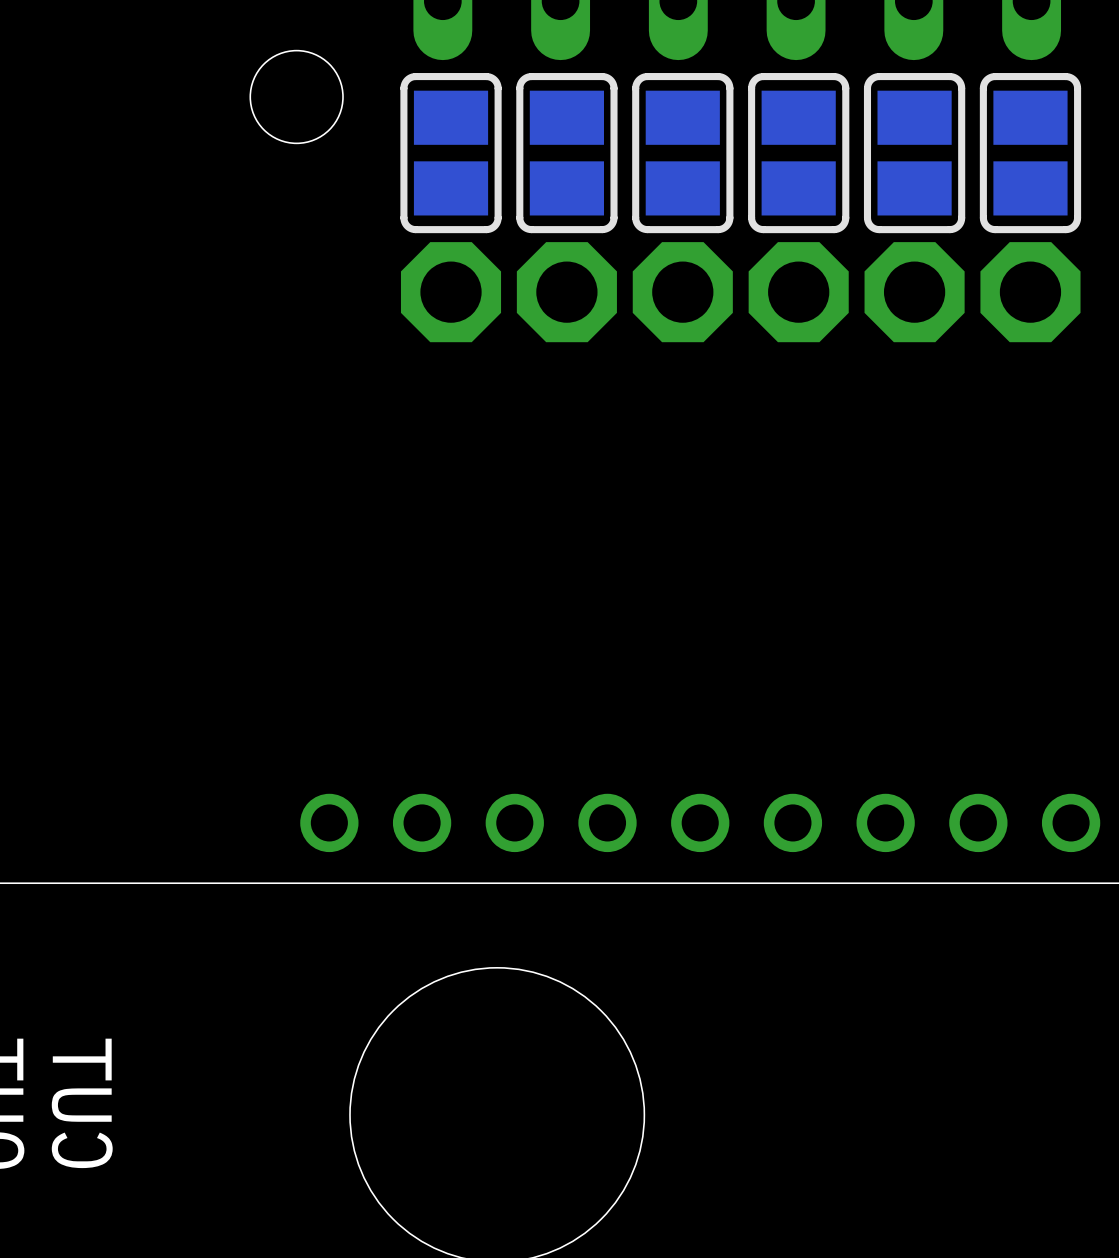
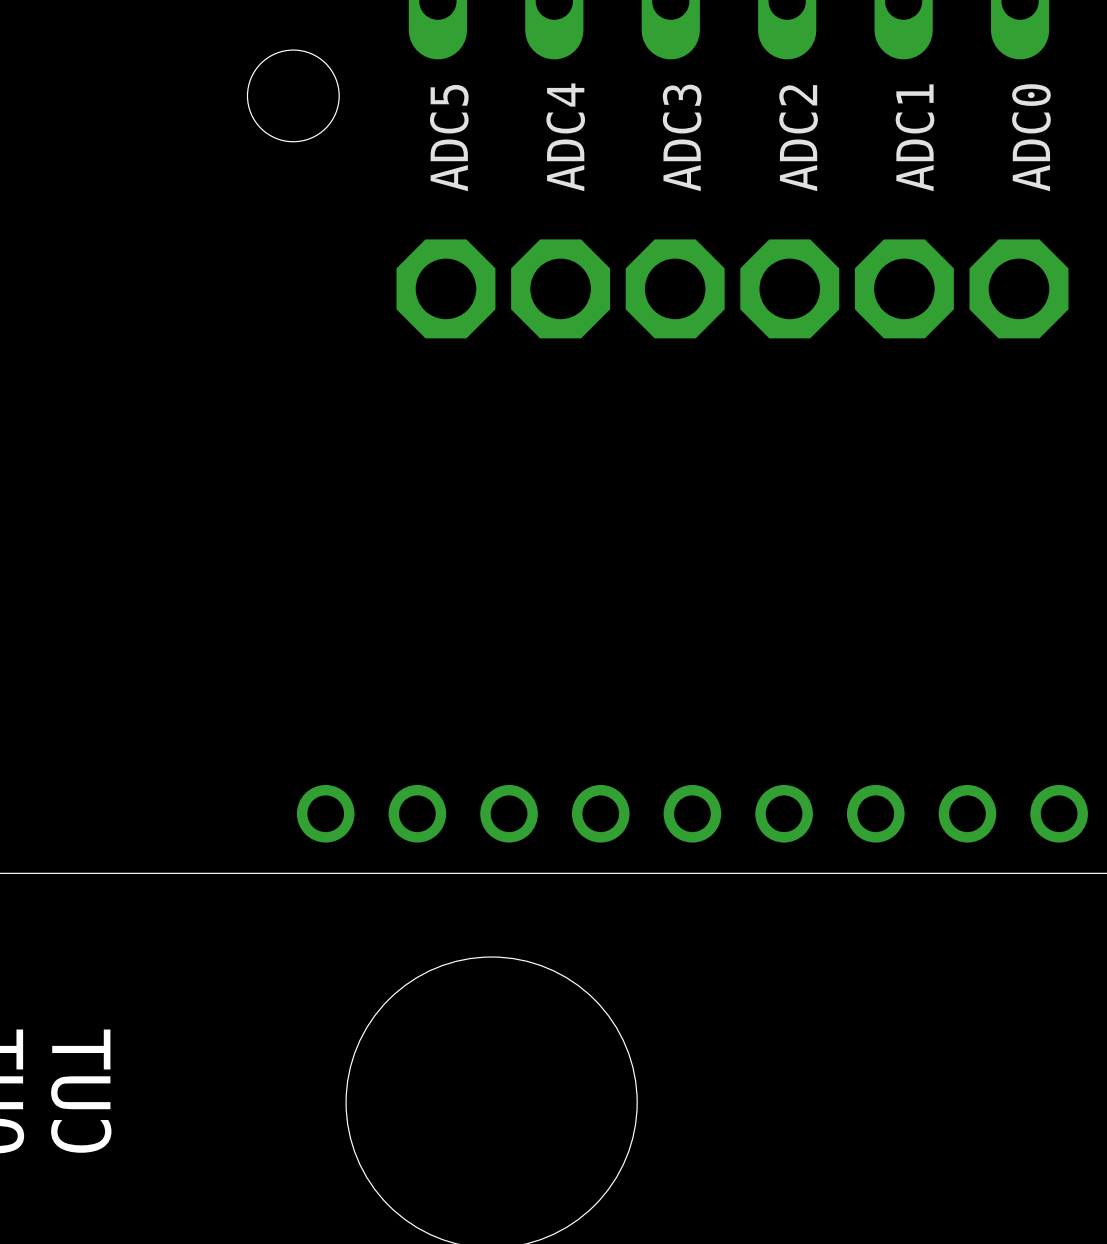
text: none -> ADC4 (565, 137)
text: none -> ADC1 (915, 137)
text: none -> ADC5 (449, 138)
text: none -> ADC3 (682, 137)
text: none -> ADC2 (798, 138)
text: none -> ADC0 (1031, 137)
part: (451, 153) -> none
part: (566, 153) -> none
part: (682, 153) -> none
part: (798, 153) -> none
part: (914, 153) -> none
part: (1030, 153) -> none

